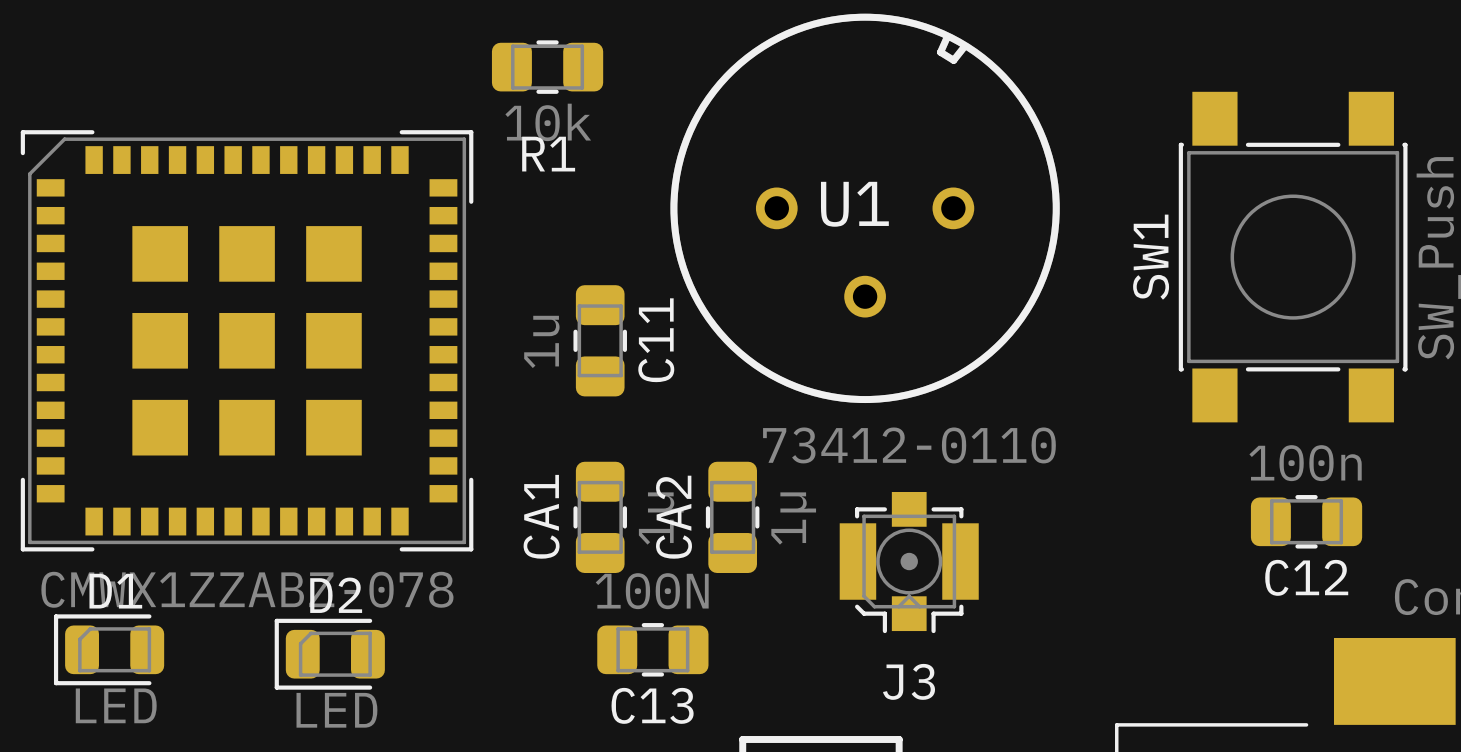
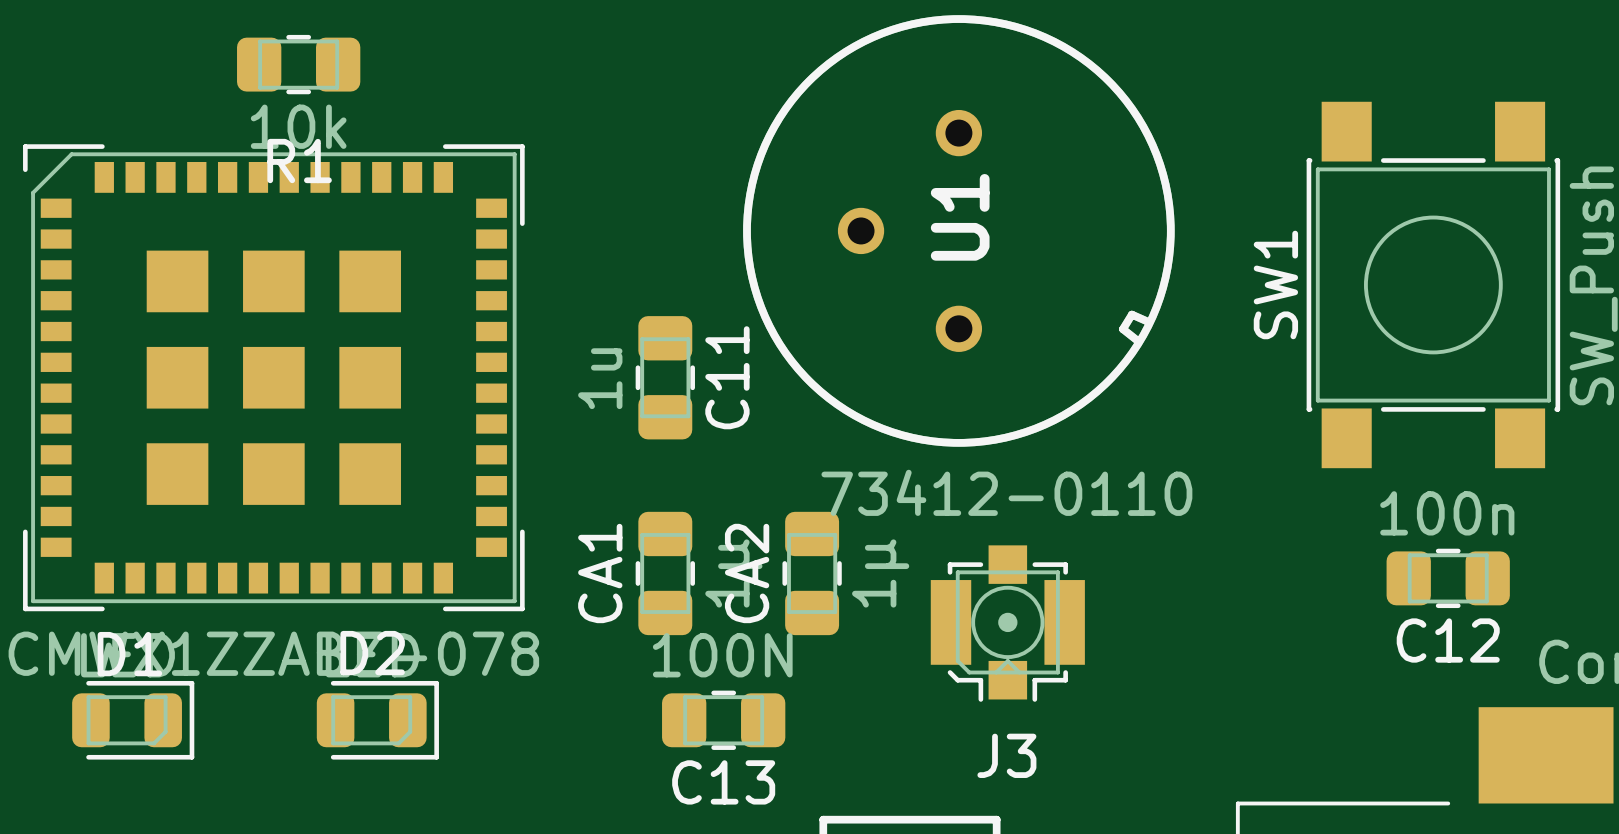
R1 position: (547, 67) -> (298, 64)
U1 rotation: 0° (865, 208) -> 90° clockwise (958, 230)
D1 rotation: 0° (109, 649) -> 180° (133, 720)
D2 rotation: 0° (329, 654) -> 180° (377, 720)

